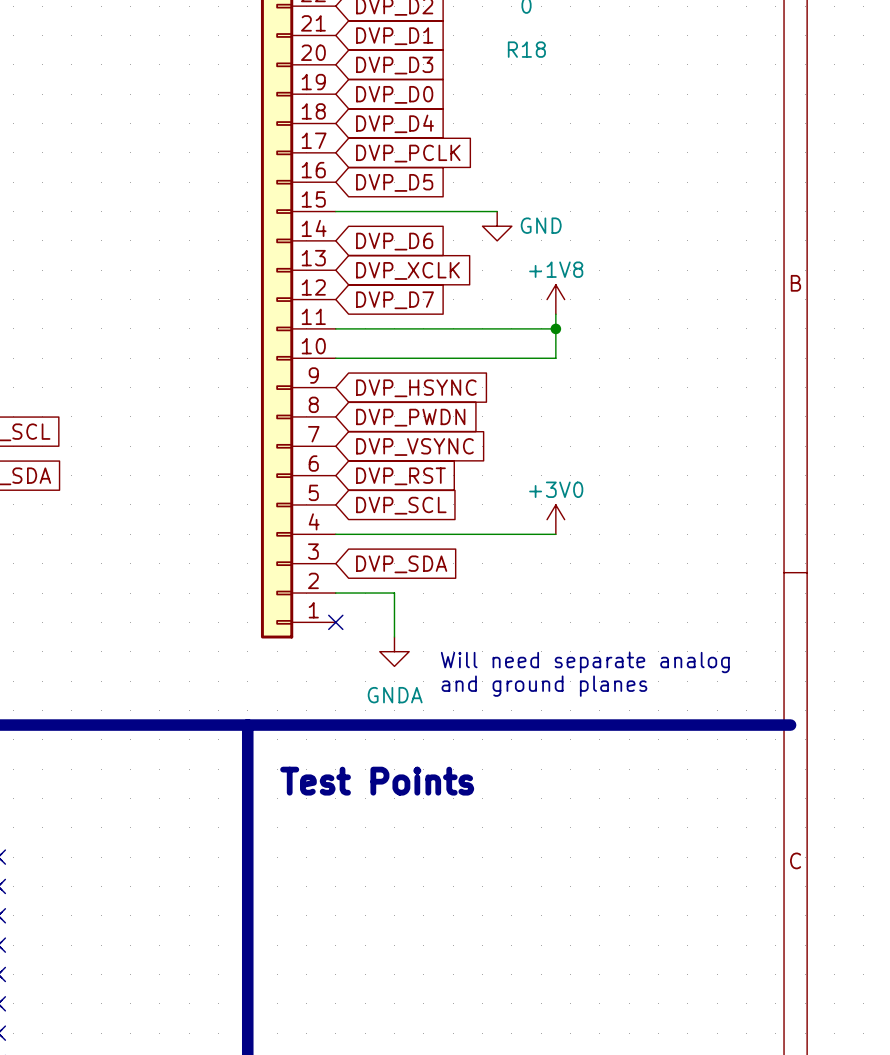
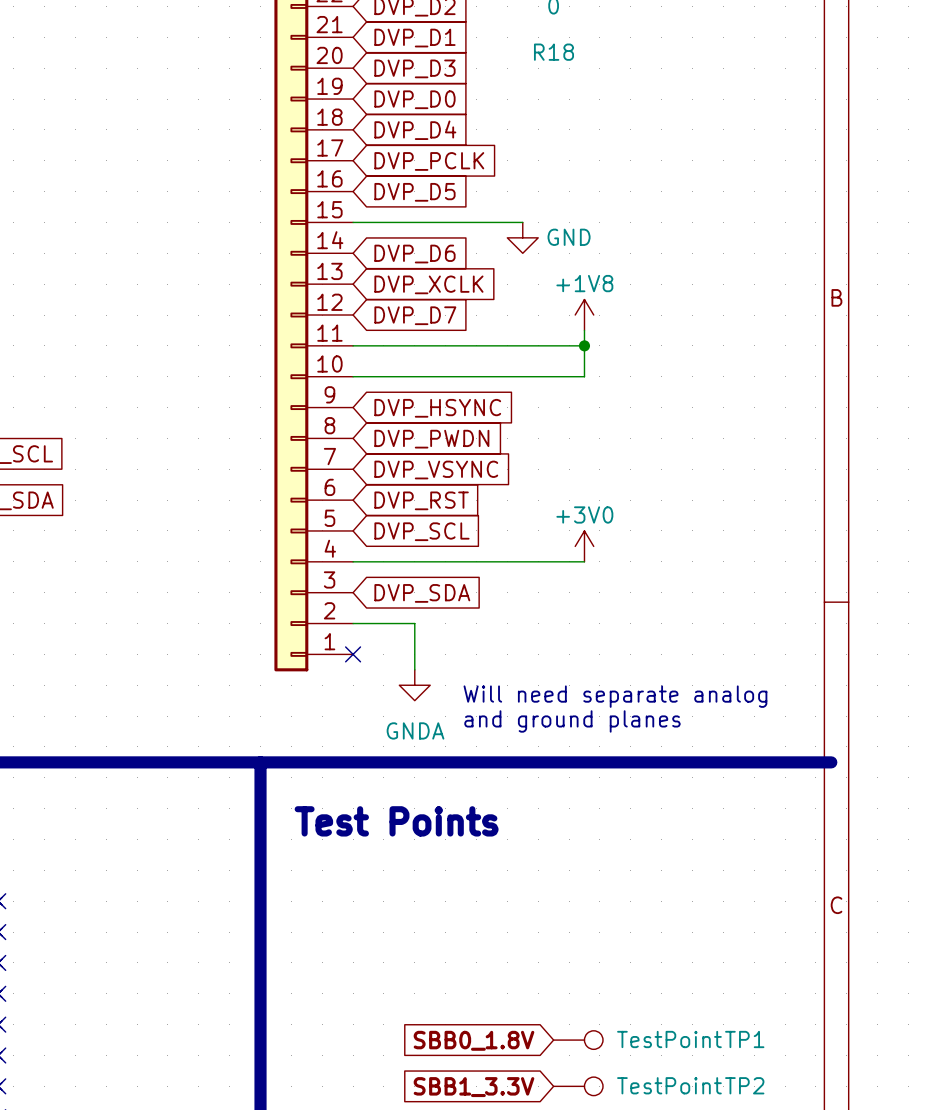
global label: none -> SBB0_1.8V (474, 1040)
TP1: none -> TestPoint (578, 1040)
global label: none -> SBB1_3.3V (474, 1087)
TP2: none -> TestPoint (578, 1086)

